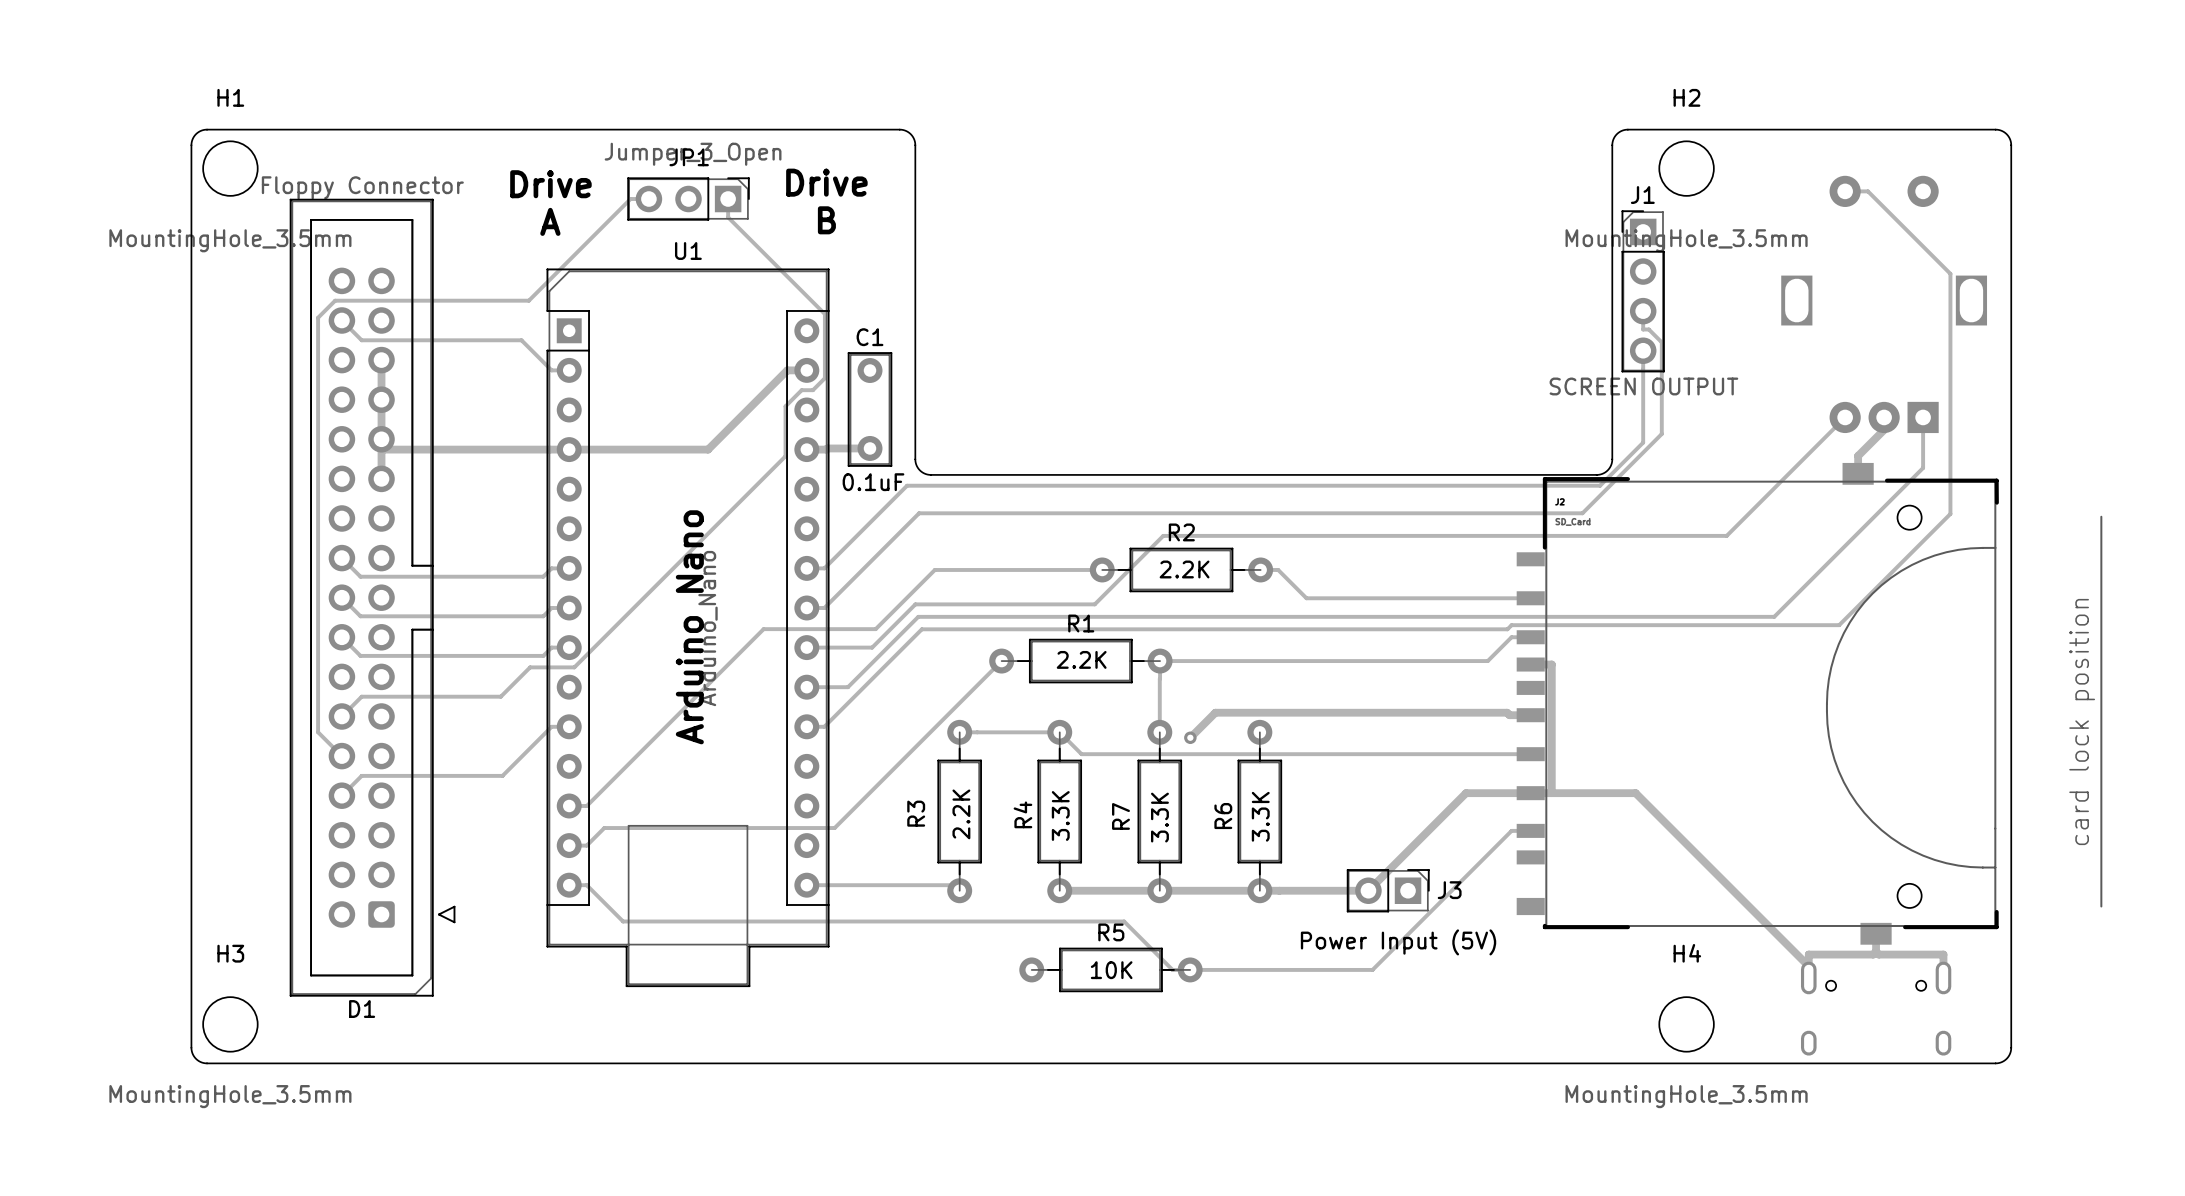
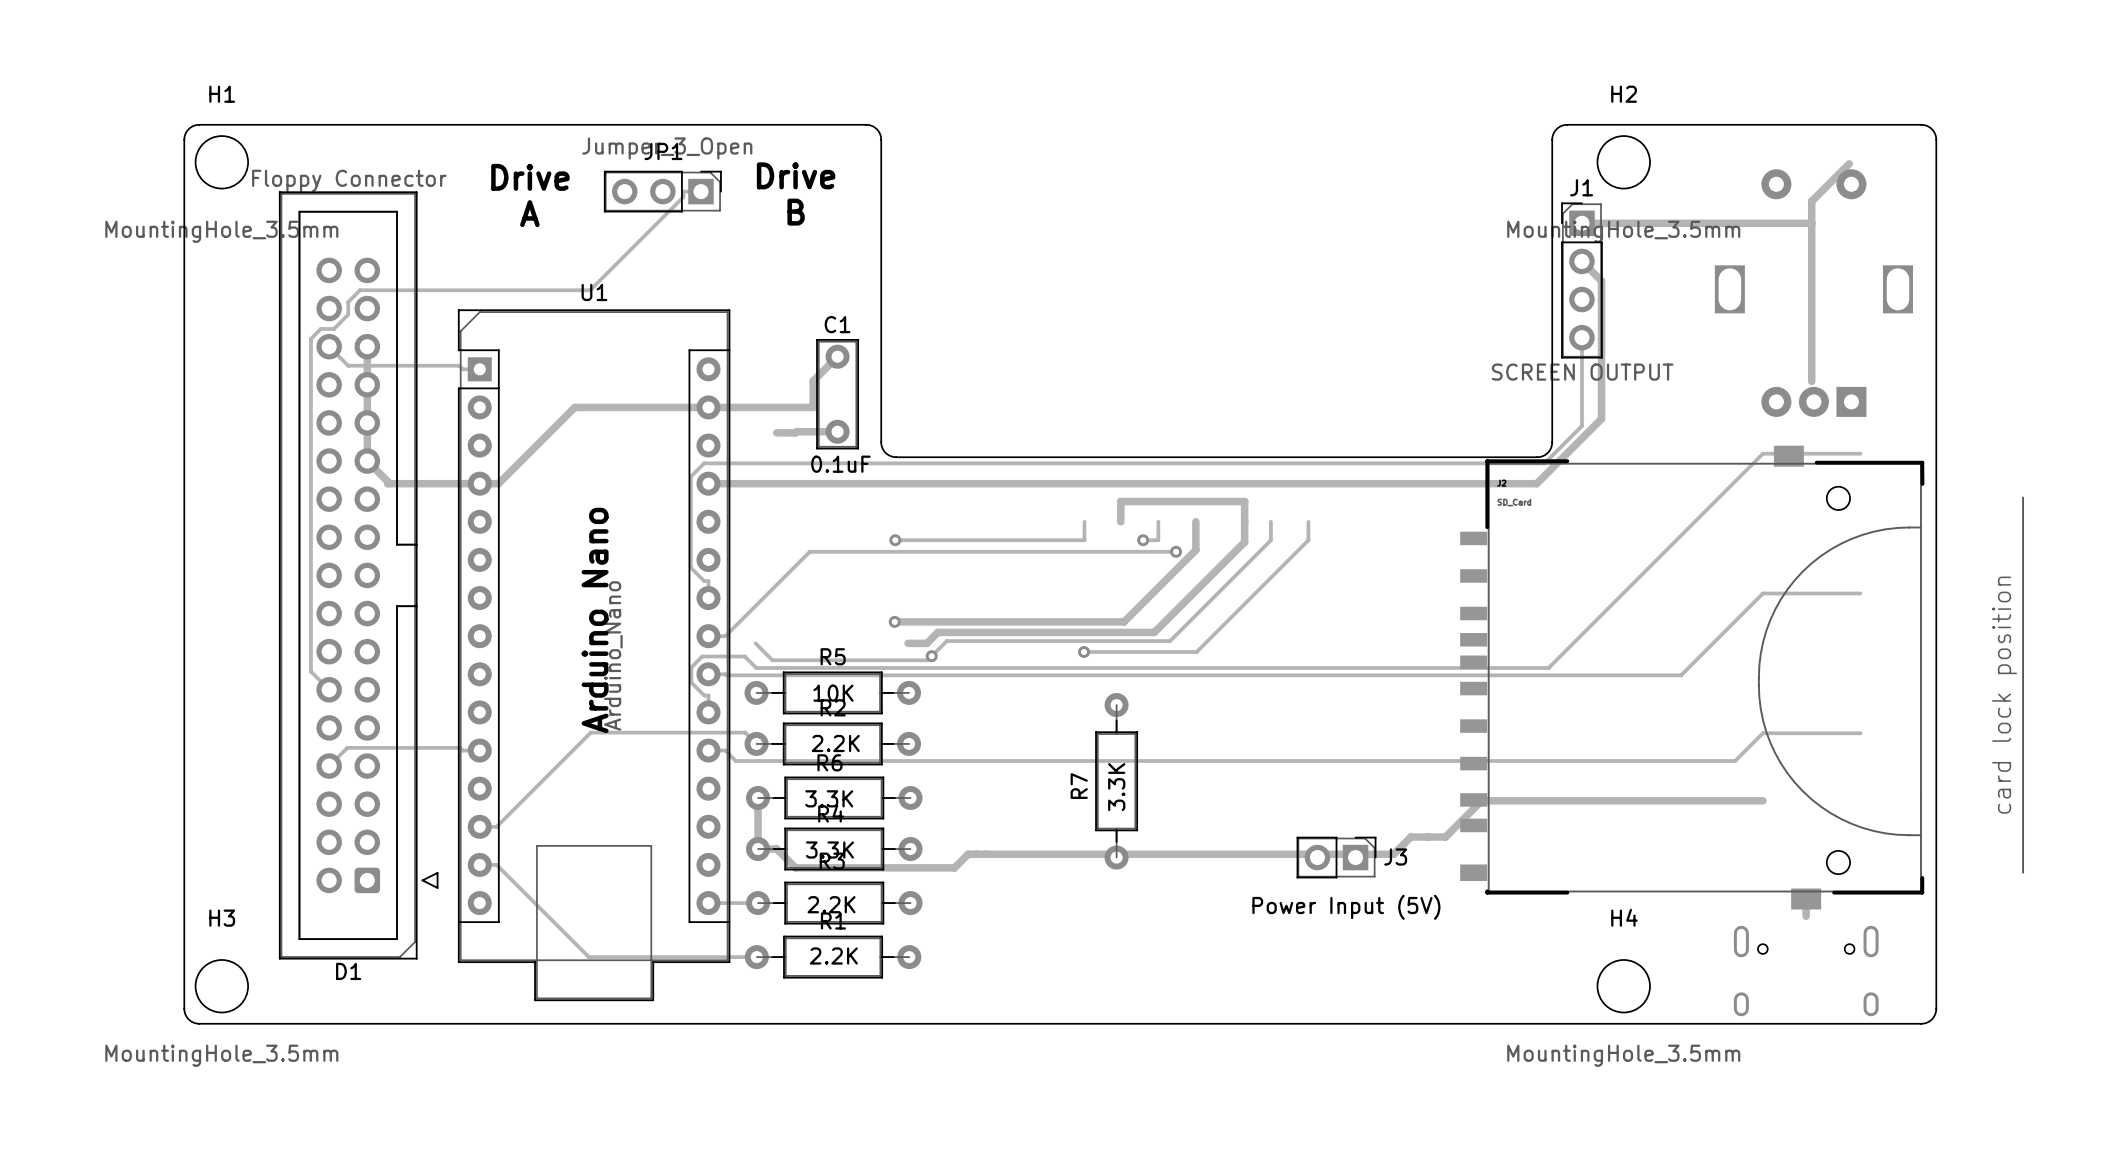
track: none -> (1849, 163) (1811, 201) (1811, 381)
track: (1845, 191) (1867, 191) (1950, 273) (1950, 513) (1839, 625) (1511, 625) (1507, 629) (921, 629) (824, 726) (806, 726) -> none
track: (648, 199) (630, 199) (528, 300) (335, 300) (318, 317) (318, 732) (341, 756) -> none
track: (728, 199) (728, 217) (824, 314) (824, 378) (812, 390) (801, 390) (785, 406) (785, 456) (574, 667) (530, 667) (500, 696) (361, 696) (341, 716) -> (700, 191) (683, 191) (683, 197) (590, 290) (360, 290) (348, 302) (348, 314) (333, 329) (320, 329) (310, 338) (310, 671) (329, 689)
track: none -> (1581, 223) (1811, 223)
track: none -> (1581, 261) (1601, 280) (1601, 418) (1536, 483) (708, 483)
track: (1643, 311) (1643, 329) (1648, 329) (1661, 342) (1661, 433) (1582, 513) (919, 513) (824, 607) (806, 607) -> none
track: (341, 320) (361, 340) (521, 340) (551, 370) (569, 370) -> none
track: none -> (329, 346) (348, 365) (459, 365) (462, 369) (479, 369)
track: (806, 370) (787, 370) (708, 449) (381, 449) -> none
track: none -> (837, 356) (813, 381) (813, 407) (574, 407) (498, 483) (387, 483) (367, 461)
track: (1845, 417) (1726, 535) (1163, 535) (1094, 604) (915, 604) (872, 647) (806, 647) -> none
track: (1884, 417) (1884, 429) (1858, 455) (1858, 473) -> none
track: (1923, 417) (1923, 468) (1774, 616) (918, 616) (847, 687) (806, 687) -> none
track: none -> (1860, 453) (1762, 453) (1548, 667) (756, 667) (744, 656) (702, 656) (691, 667) (691, 682) (704, 695) (708, 695) (708, 712)
track: (1604, 481) (1600, 485) (907, 485) (824, 568) (806, 568) -> (1544, 463) (704, 463) (690, 476) (690, 567) (704, 581) (708, 581) (708, 598)
track: none -> (1084, 521) (1084, 540) (895, 540)
track: none -> (1120, 521) (1120, 501) (1244, 501) (1244, 542) (1154, 632) (937, 632) (926, 643) (908, 643)
track: none -> (1158, 521) (1158, 540) (1143, 540)
track: none -> (1195, 521) (1195, 550) (1124, 621) (894, 621)
track: none -> (1270, 521) (1270, 540) (1170, 641) (946, 641) (927, 660) (772, 660) (755, 643)
track: none -> (1308, 521) (1308, 540) (1196, 651) (1084, 651)
track: (341, 558) (360, 576) (543, 576) (551, 568) (569, 568) -> none
via: none -> (895, 540)
via: none -> (1143, 540)
track: (1102, 569) (934, 569) (875, 629) (763, 629) (586, 805) (569, 805) -> none
R2 position: (1181, 569) -> (832, 743)
track: (1260, 569) (1278, 569) (1306, 598) (1530, 598) -> none
track: none -> (1176, 551) (809, 551) (725, 636) (708, 636)
via: none -> (1176, 551)
track: (341, 597) (360, 616) (543, 616) (551, 607) (569, 607) -> none
track: none -> (1860, 593) (1762, 593) (1681, 675) (708, 674)
U1 position: (688, 627) -> (594, 655)
text position: Arduino Nano (689, 627) -> Arduino Nano (595, 620)
track: (341, 637) (360, 655) (543, 655) (551, 647) (569, 647) -> none
track: (1530, 637) (1511, 637) (1487, 661) (1160, 661) (1159, 732) -> none
via: none -> (894, 621)
track: (1001, 661) (834, 828) (604, 828) (586, 845) (569, 845) -> none
R1 position: (1080, 661) -> (833, 957)
track: (1530, 664) (1551, 664) (1551, 793) -> none
via: none -> (1084, 651)
via: none -> (931, 656)
track: (1530, 715) (1509, 715) (1507, 712) (1215, 712) (1190, 737) -> none
track: (569, 726) (551, 726) (502, 775) (360, 776) -> (479, 750) (462, 750) (460, 747) (347, 747)
track: (959, 732) (1059, 732) (1081, 754) (1530, 754) -> none
via: (1190, 737) -> none
track: none -> (1860, 733) (1762, 733) (1735, 761) (735, 761) (725, 750) (708, 750)
track: none -> (756, 743) (745, 732) (590, 732) (496, 826) (479, 826)
R3 rotation: 0° (959, 811) -> 90° clockwise (834, 903)
R3 position: (959, 811) -> (834, 903)
R4 rotation: 0° (1059, 811) -> 90° clockwise (834, 849)
R4 position: (1059, 811) -> (834, 849)
R6 rotation: 0° (1259, 811) -> 90° clockwise (834, 797)
R6 position: (1259, 811) -> (834, 797)
track: none -> (758, 797) (758, 849) (776, 849) (795, 867) (954, 867) (968, 854) (1393, 854) (1410, 837) (1445, 837) (1481, 800) (1762, 800)
track: (1530, 830) (1511, 830) (1372, 969) (1172, 969) (1124, 921) (623, 921) (586, 885) (569, 885) -> none
track: (806, 885) (954, 885) (959, 890) -> none
track: (1059, 890) (1368, 890) (1466, 793) (1635, 793) (1808, 966) -> none
track: none -> (479, 864) (496, 864) (588, 957) (756, 957)
track: none -> (708, 903) (758, 903)
R5 position: (1110, 969) -> (832, 692)
track: (1808, 977) (1808, 954) (1873, 954) (1876, 951) (1878, 954) (1943, 954) (1943, 977) -> none

